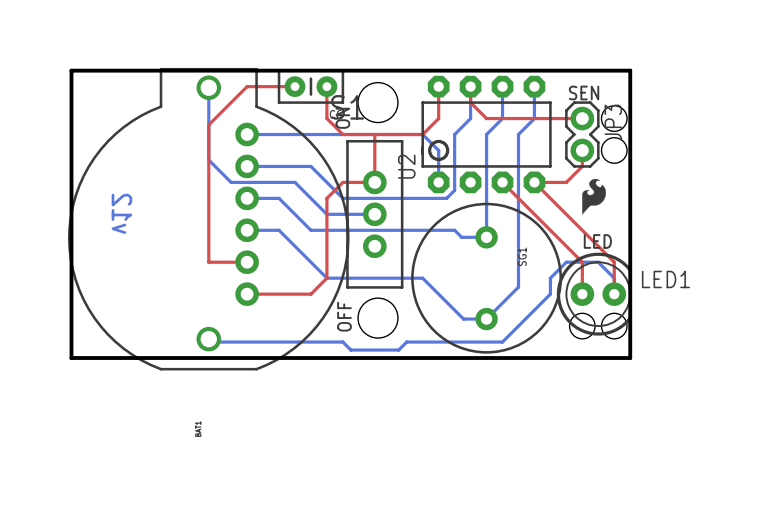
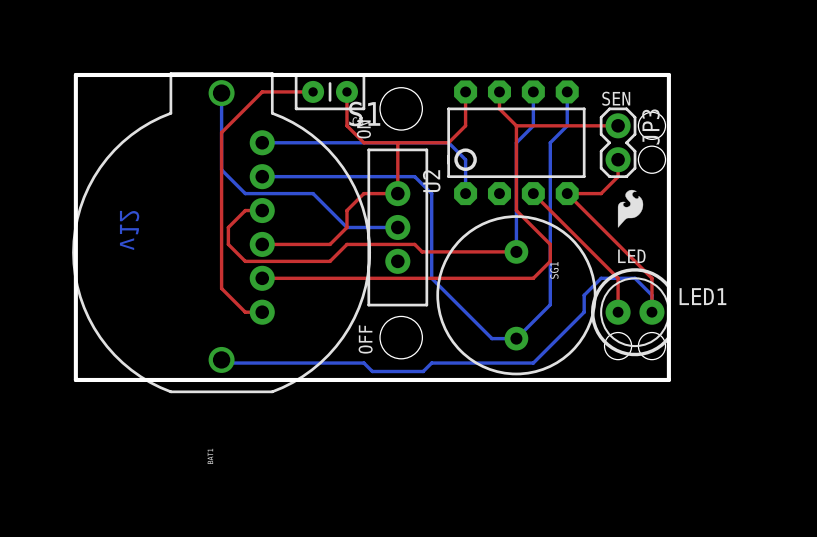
bottom track: (470, 86) (470, 118) (454, 134) (454, 190) (446, 198) (342, 198) (310, 166) -> none
top track: none -> (516, 125) (516, 210) (550, 244) (550, 261) (533, 278) (262, 278)
top track: none -> (262, 210) (245, 210) (228, 227) (228, 244) (245, 261) (330, 261) (346, 244) (414, 244) (422, 251) (516, 251)
bottom track: (247, 198) (279, 198) (310, 230) (454, 230) (461, 237) (486, 237) -> none
top track: (326, 214) (326, 278) (310, 294) (247, 294) -> (346, 227) (330, 244) (262, 244)
bottom track: (247, 230) (279, 230) (326, 278) (422, 278) -> (330, 176) (414, 176) (431, 193) (431, 278) (448, 295)
top track: (208, 262) (247, 262) -> (221, 278) (221, 288) (245, 312) (262, 312)

